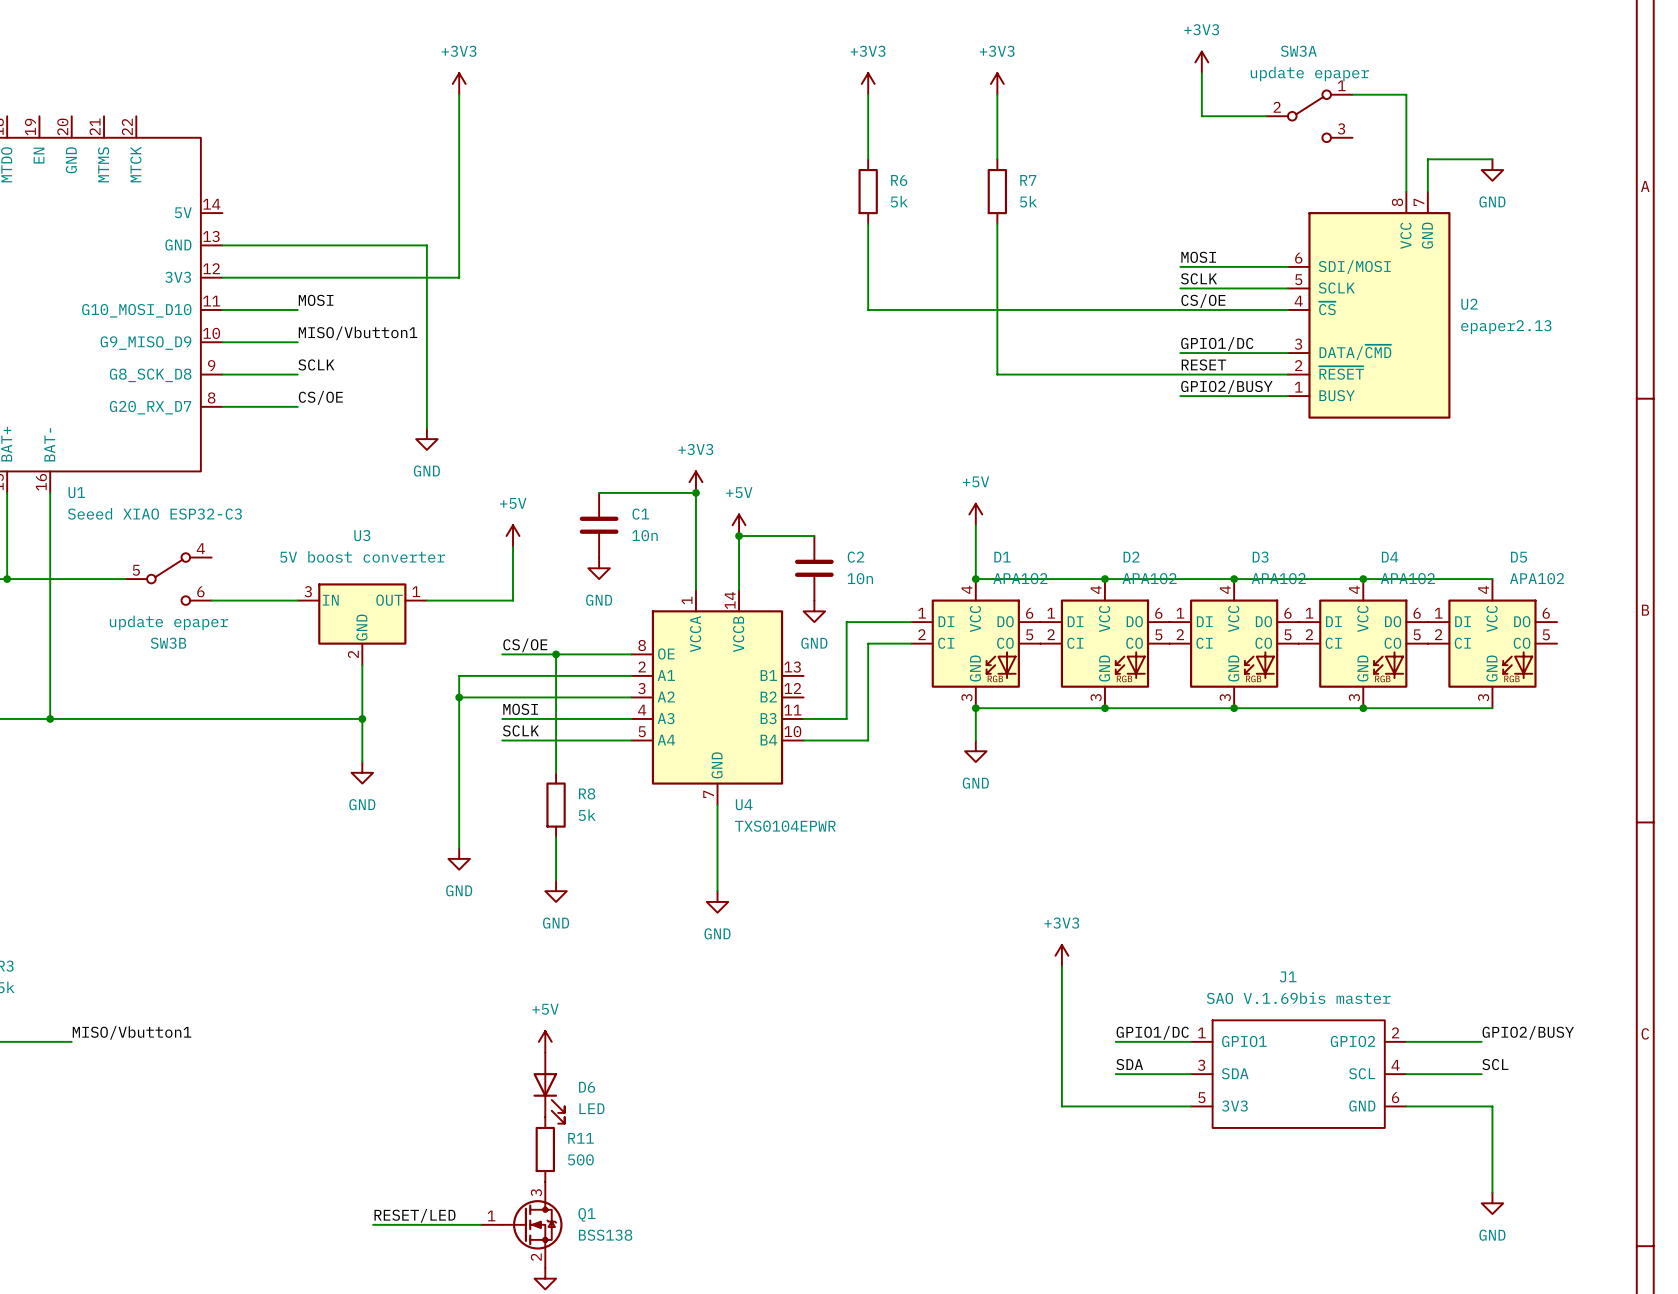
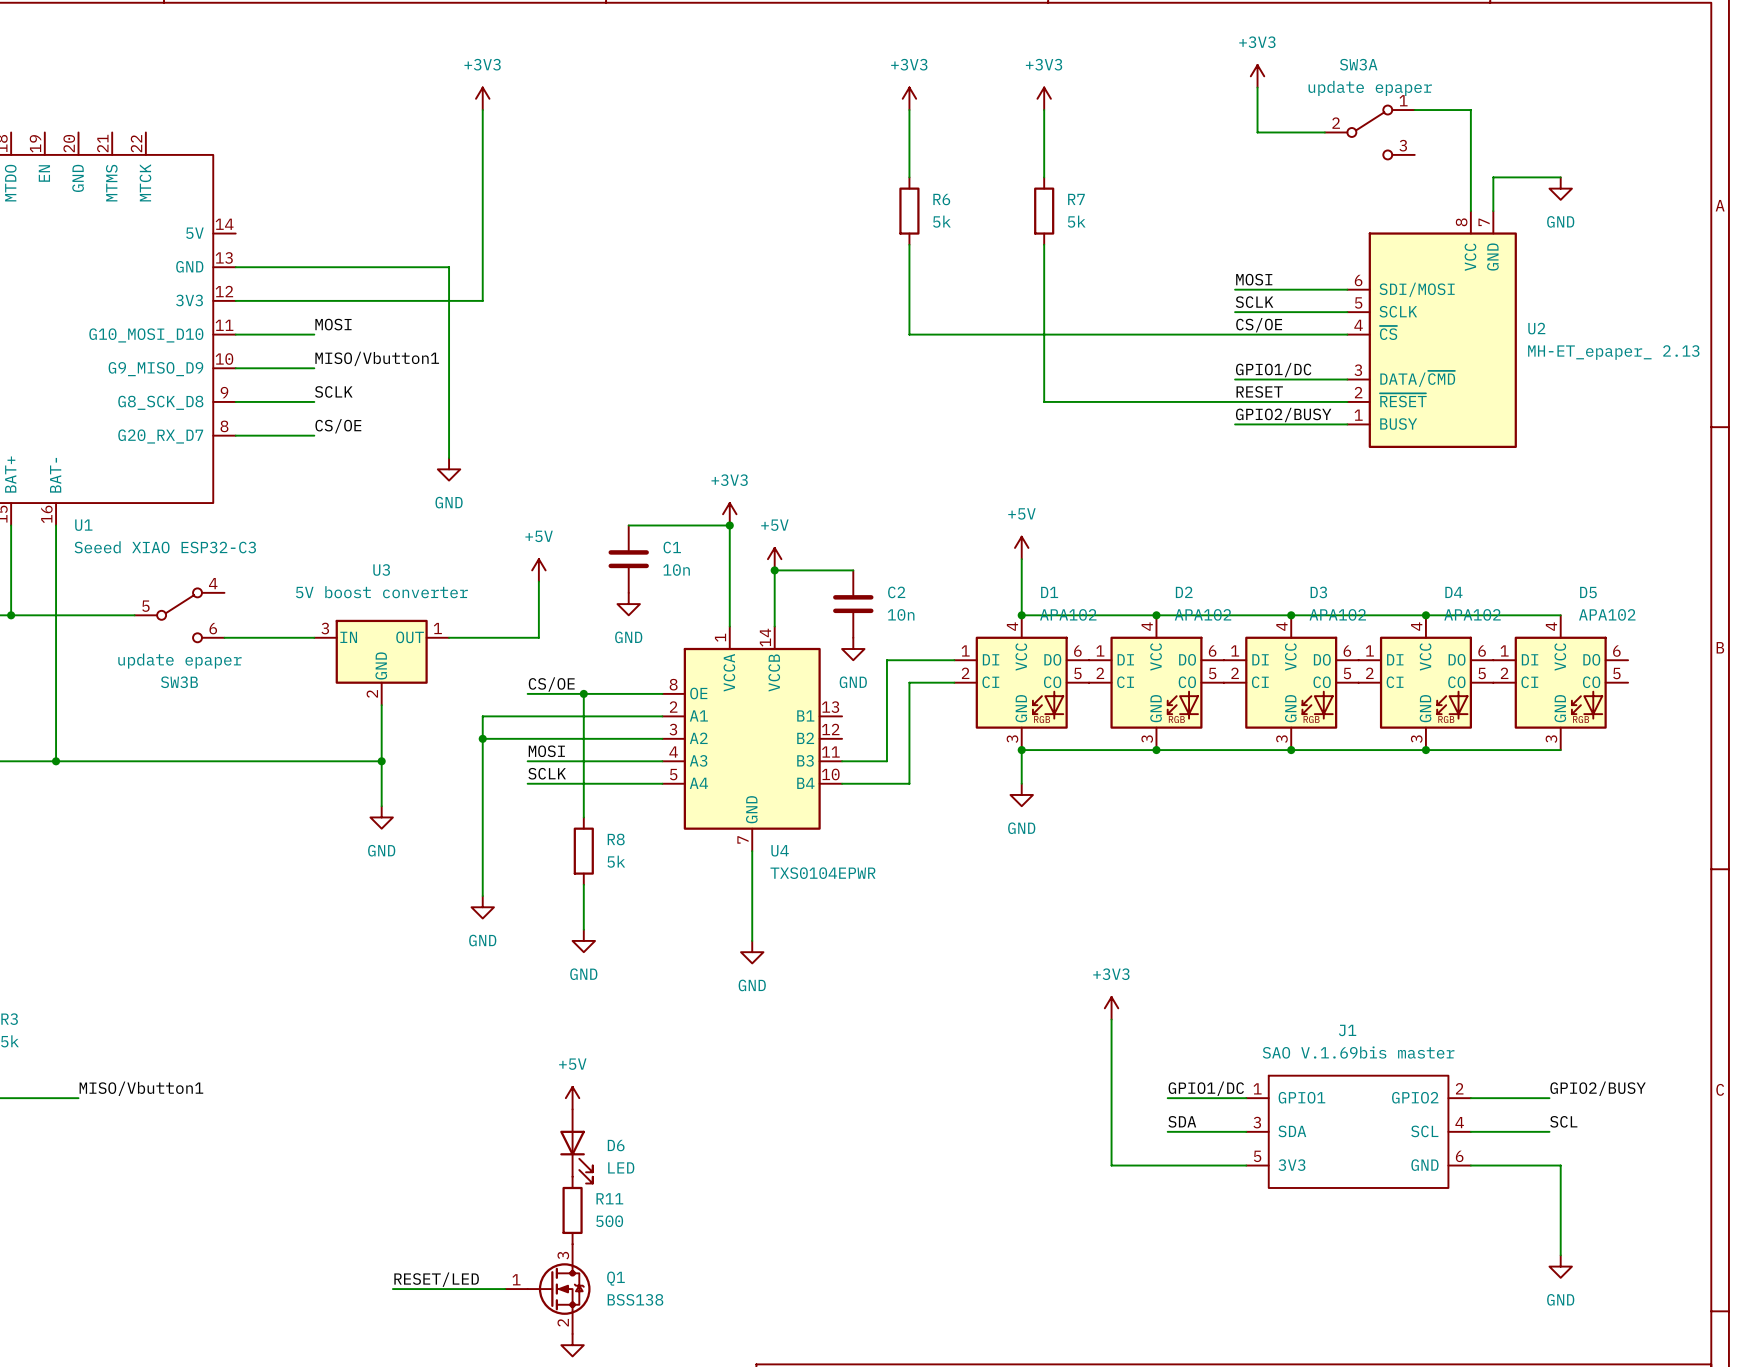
U2 value: epaper2.13 (1506, 327) -> MH-ET_epaper_ 2.13 (1613, 352)

